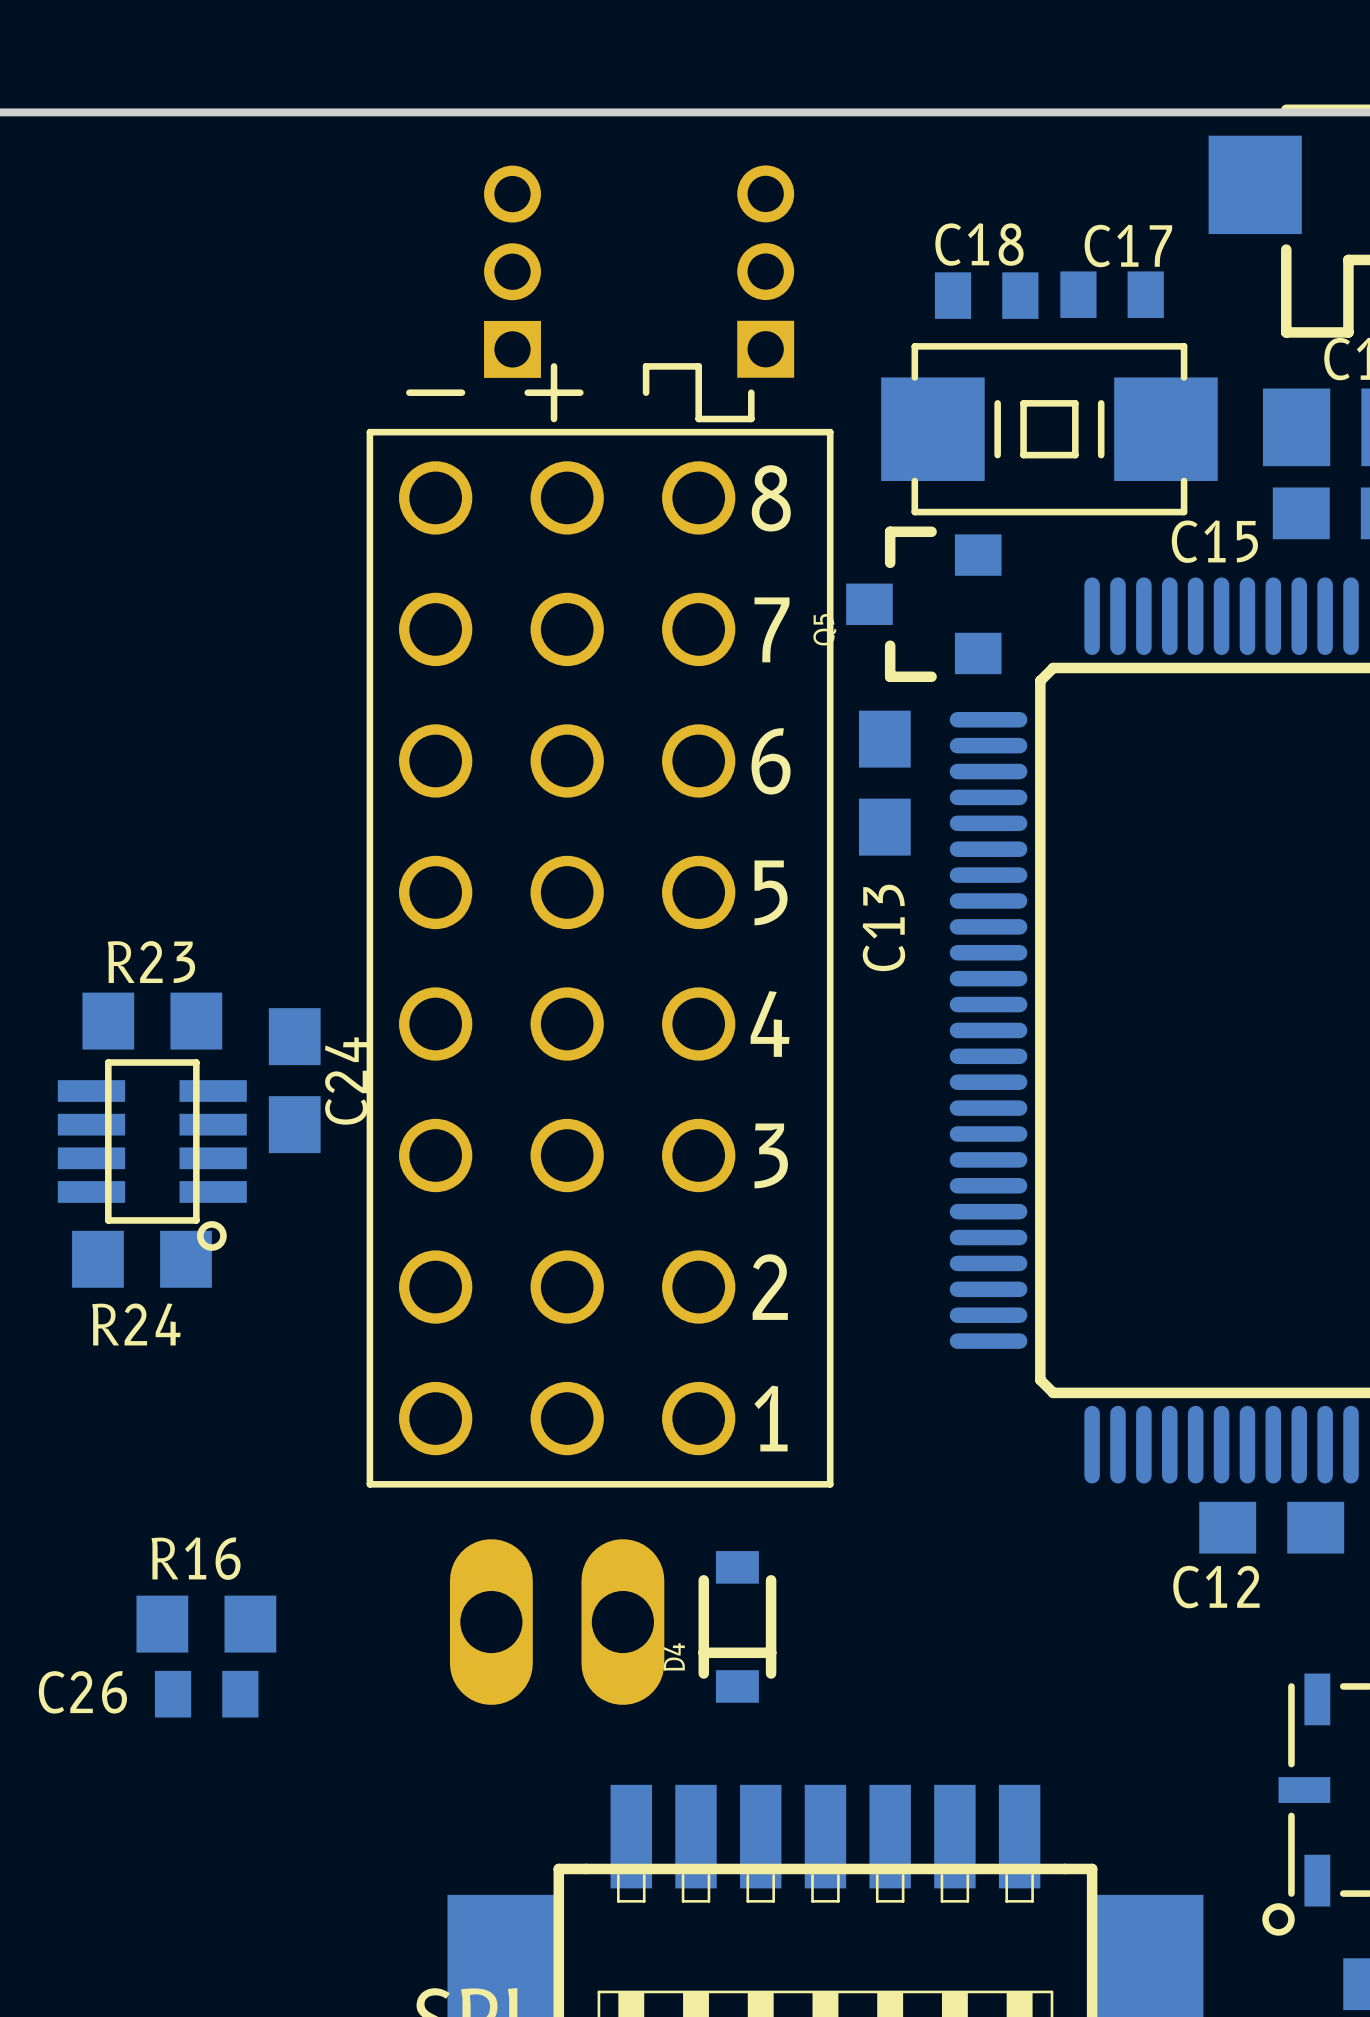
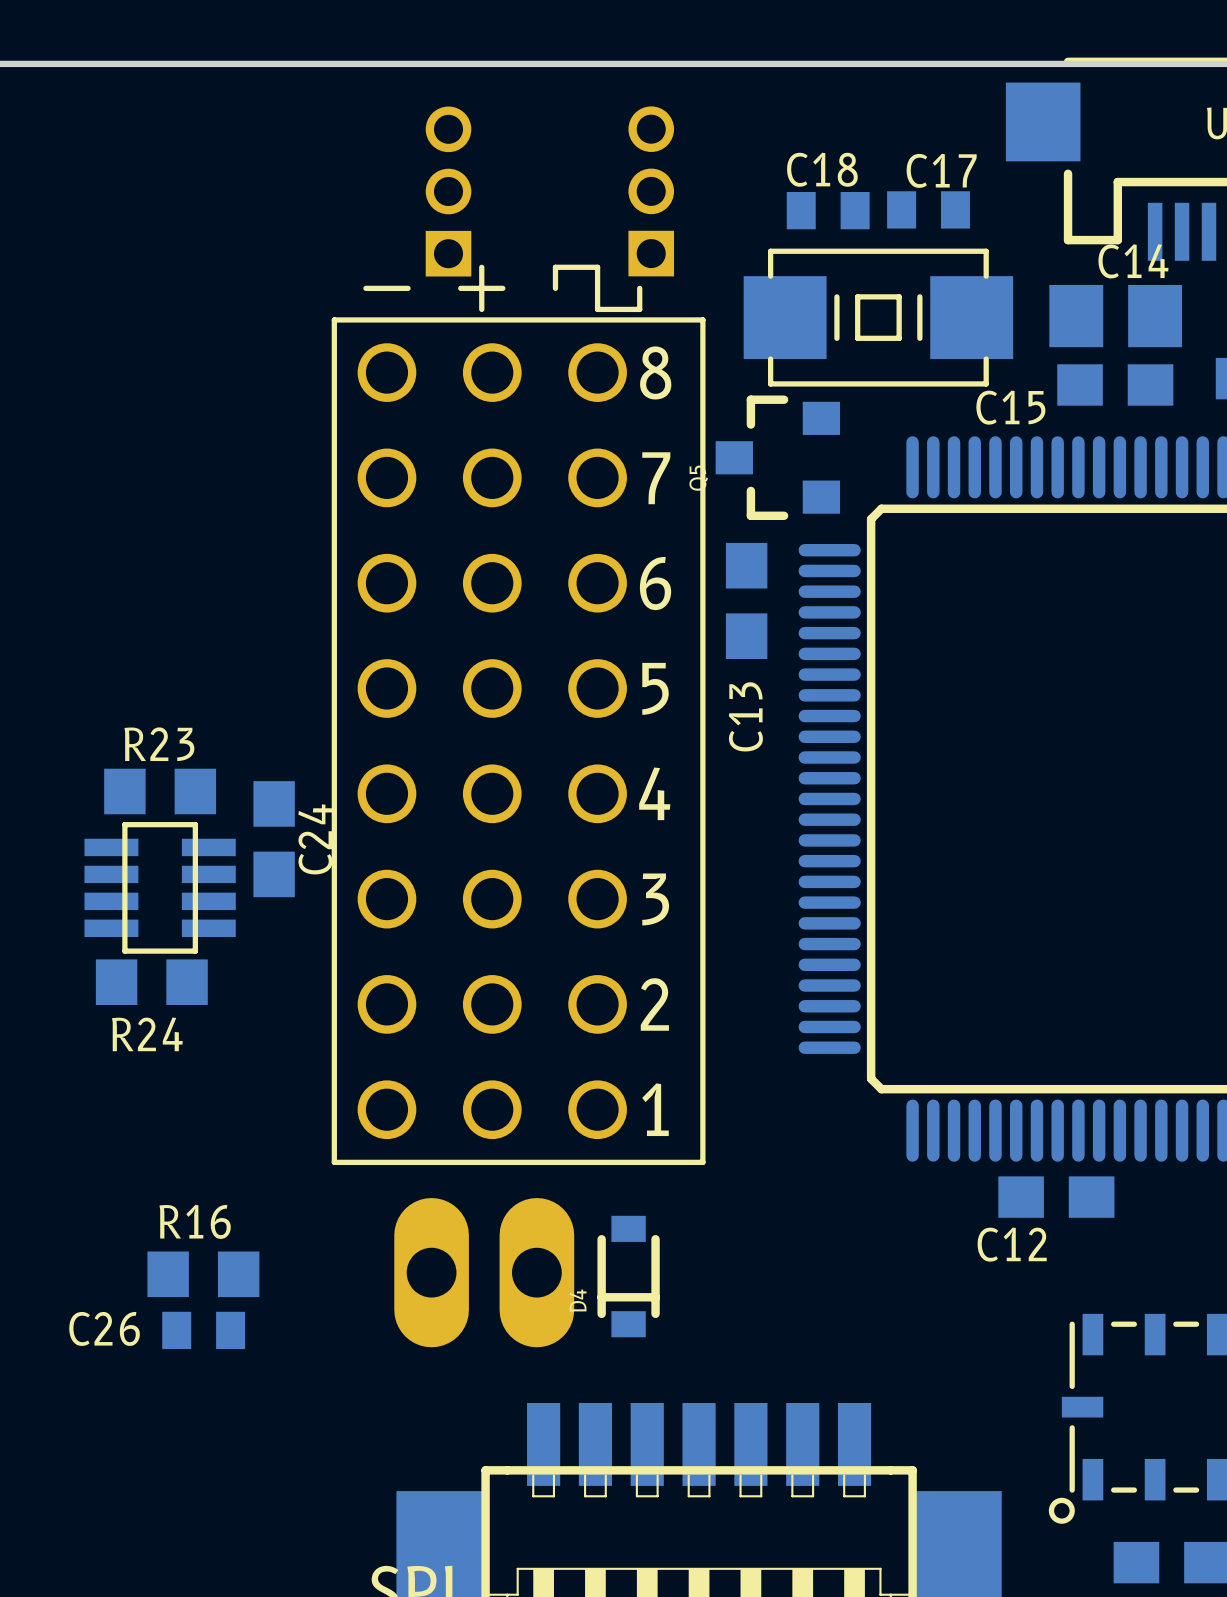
part footprint: [57, 1059, 247, 1251] -> [84, 822, 236, 954]
part footprint: [449, 1539, 665, 1705] -> [394, 1198, 575, 1348]

